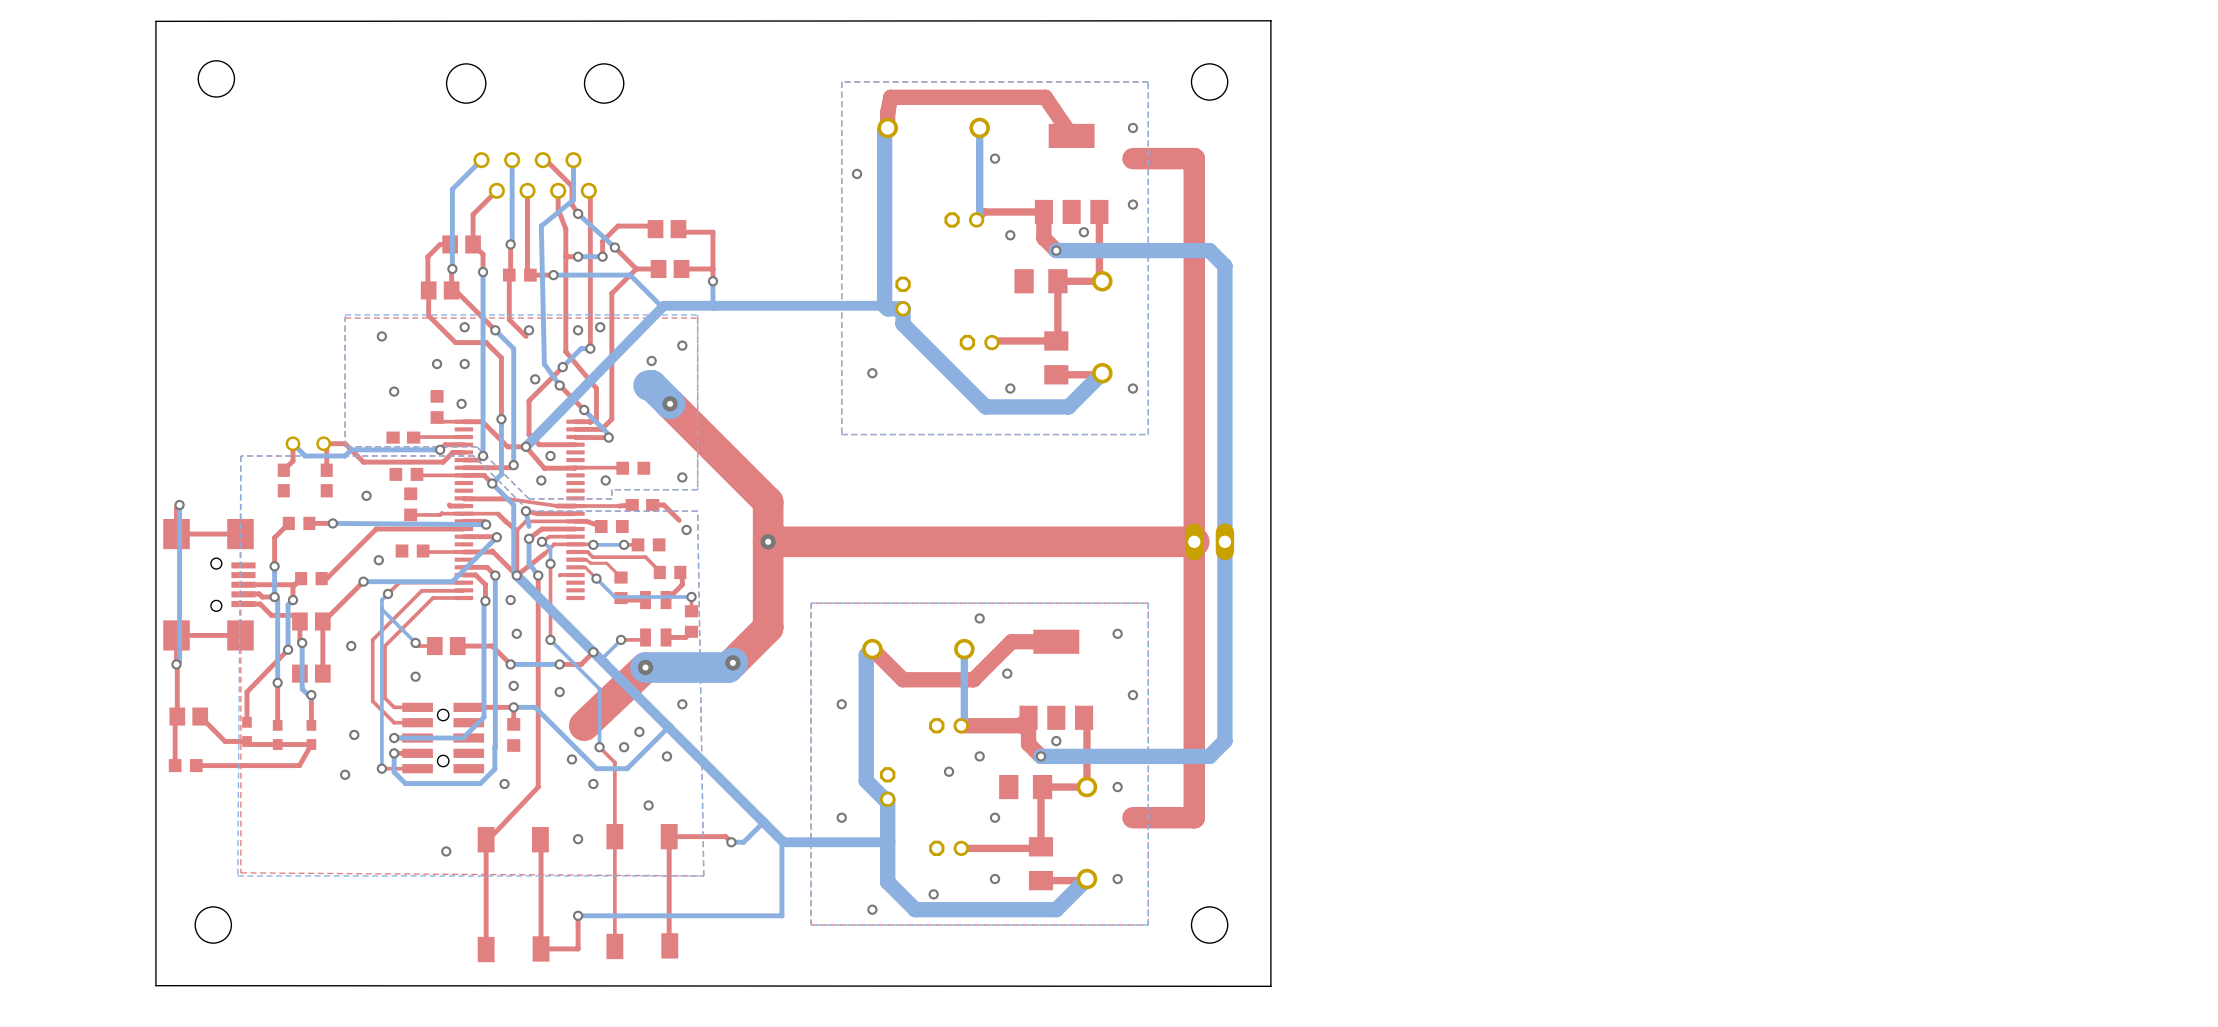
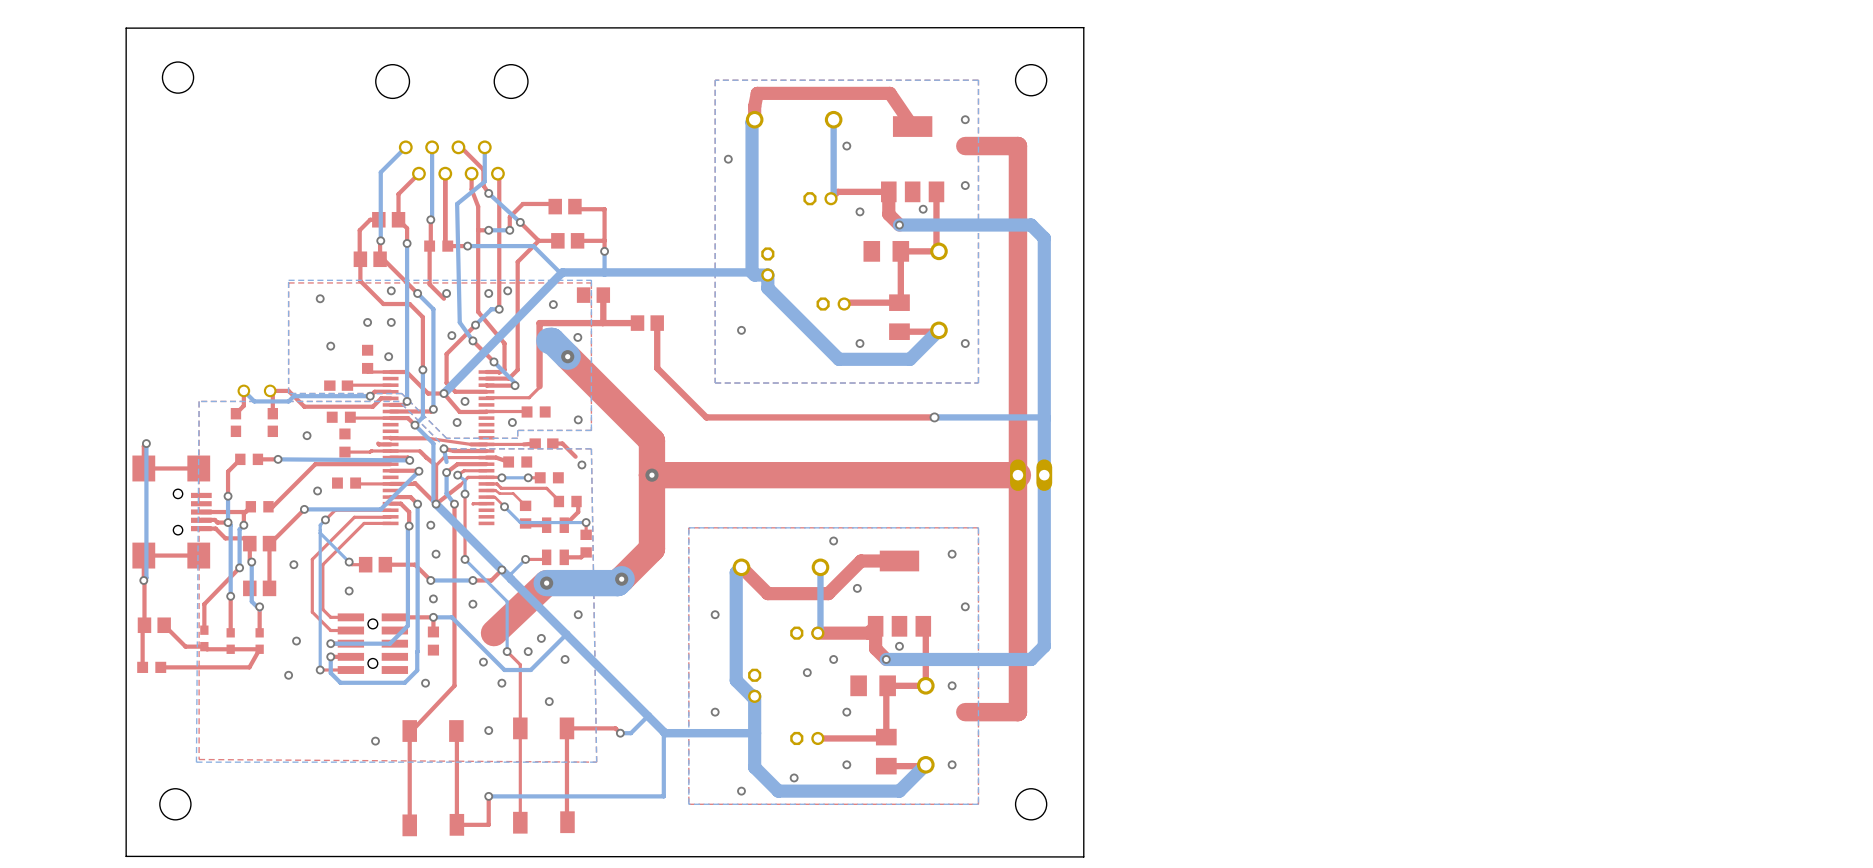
part: none -> (593, 295)
top track: none -> (603, 295) (602, 323)
via: none -> (553, 304)
via: (682, 345) -> none
via: (651, 360) -> none
top track: none -> (637, 323) (539, 323) (539, 387) (529, 397) (486, 398)
part: none -> (647, 323)
top track: none -> (657, 323) (657, 368) (706, 417) (934, 417)
via: none -> (577, 337)
bottom track: none -> (934, 417) (1044, 418)
via: none -> (934, 417)

